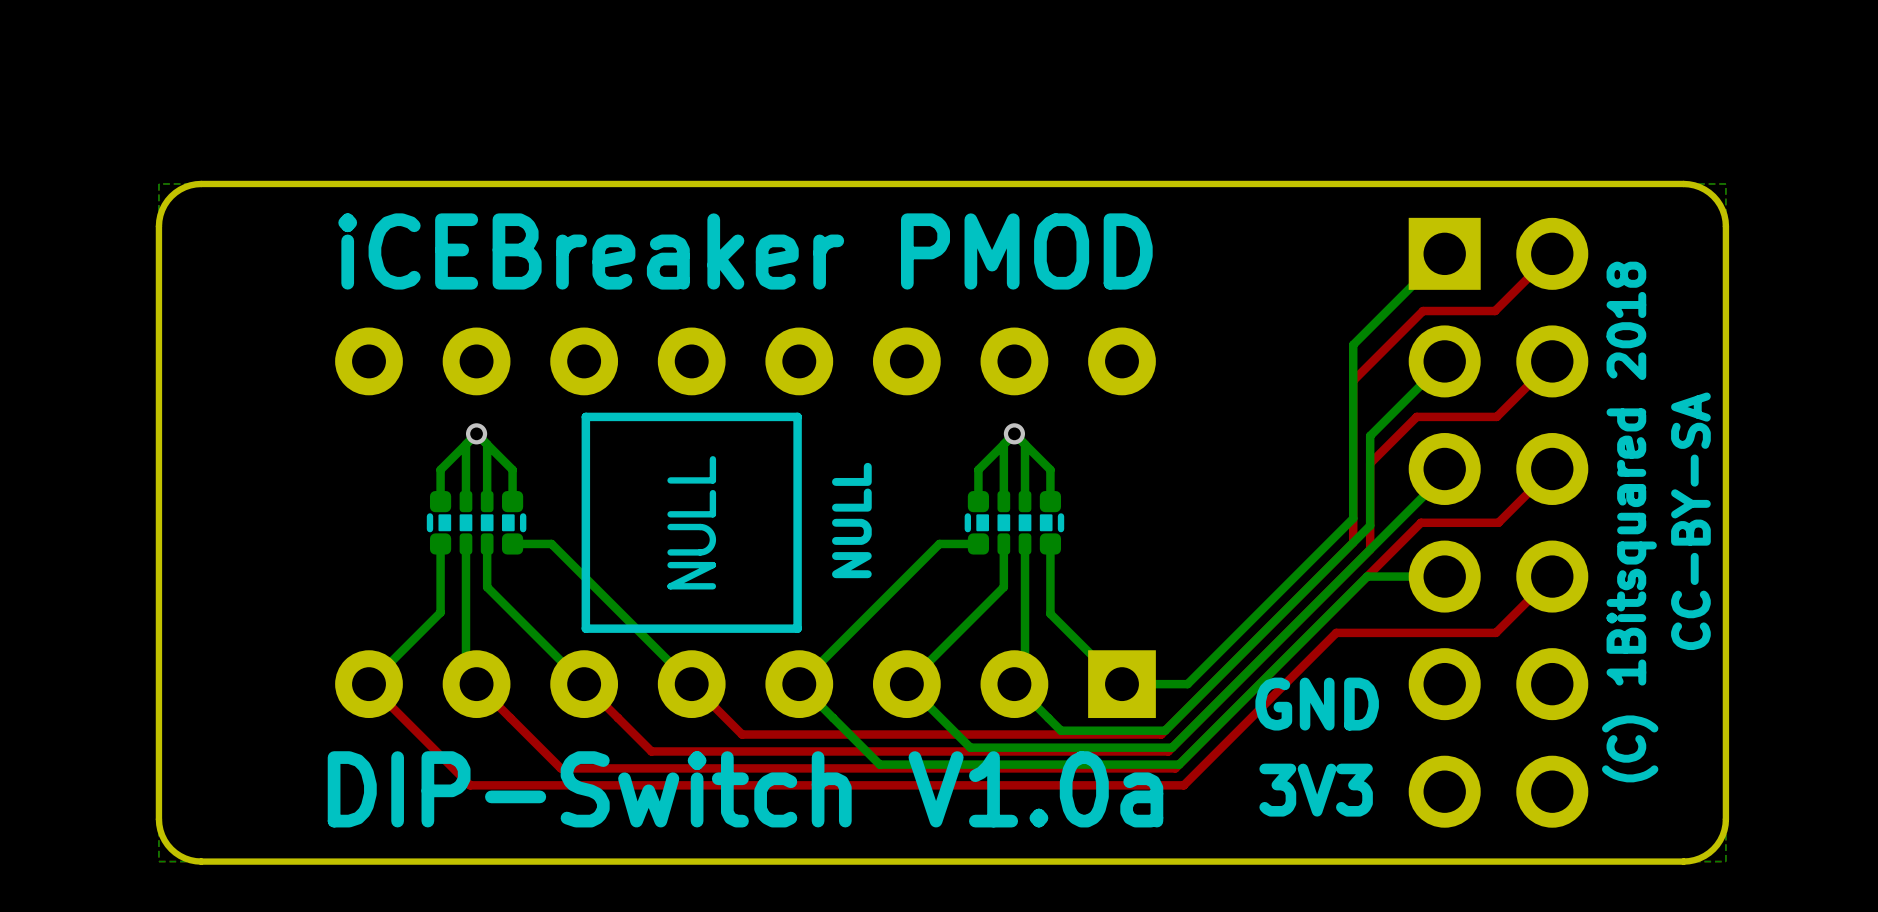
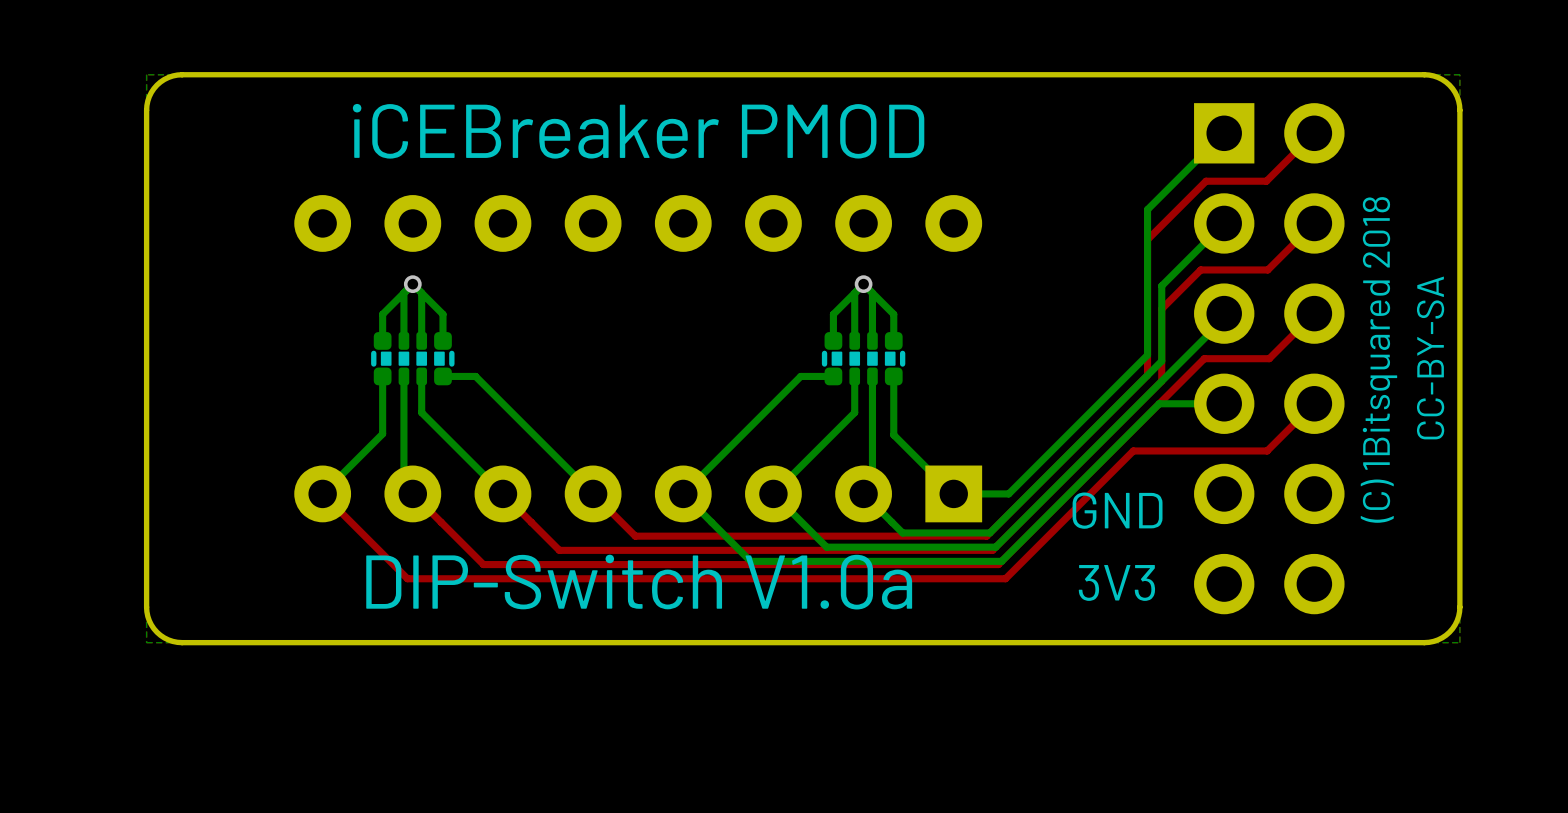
drawing: [581, 412, 802, 633] -> none
text: NULL (851, 520) -> none

